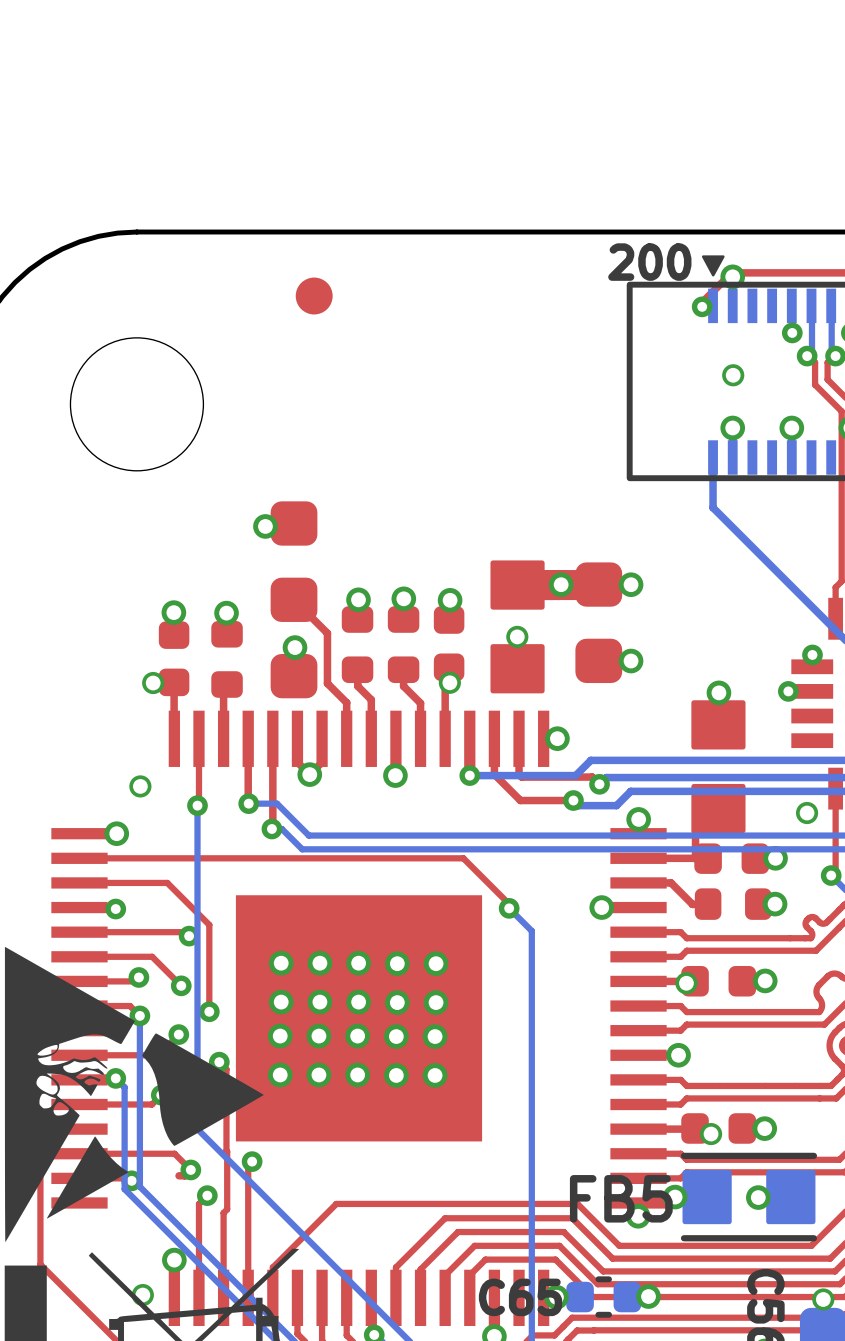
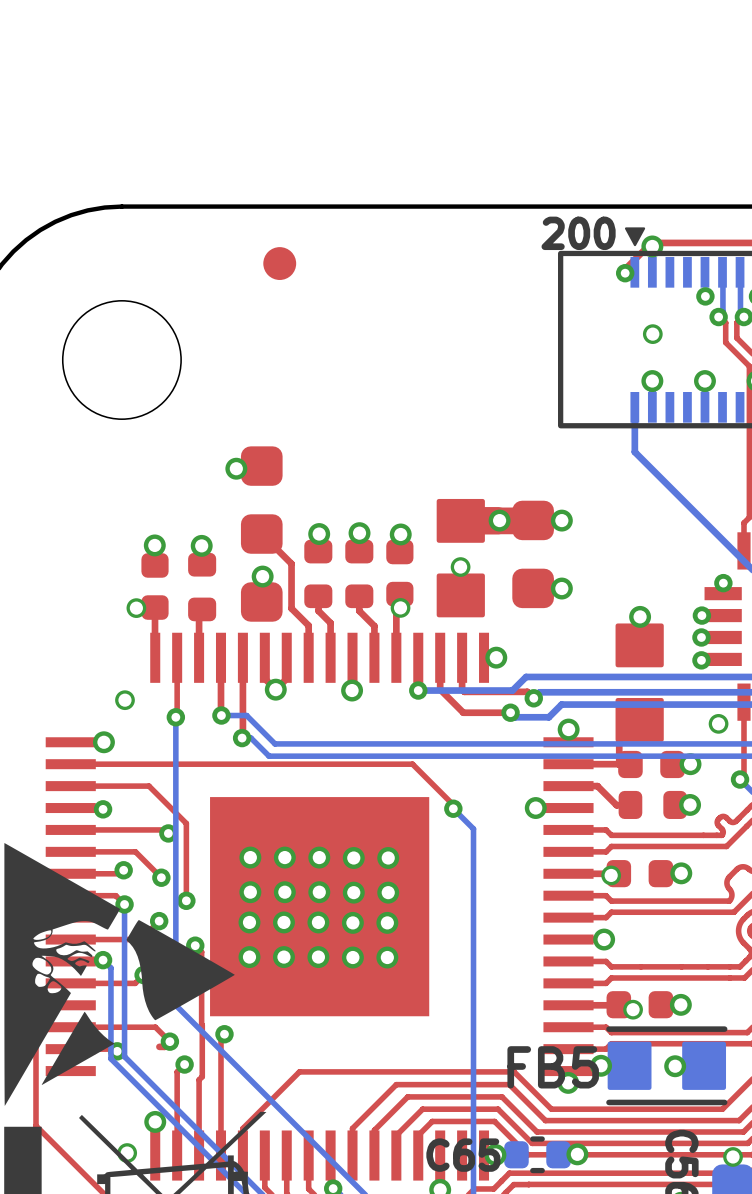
via: none -> (701, 637)
via: none -> (701, 660)

